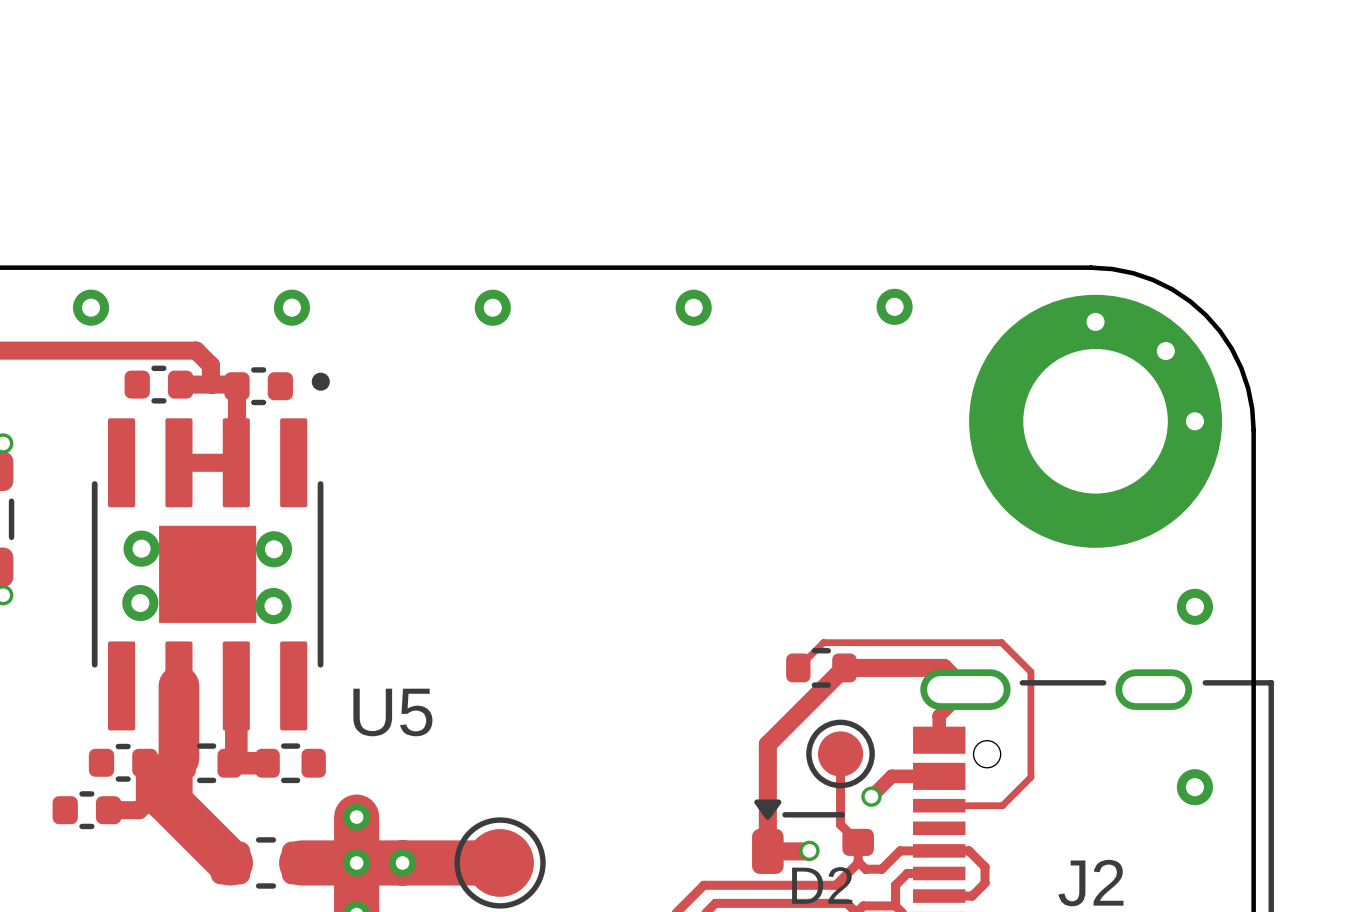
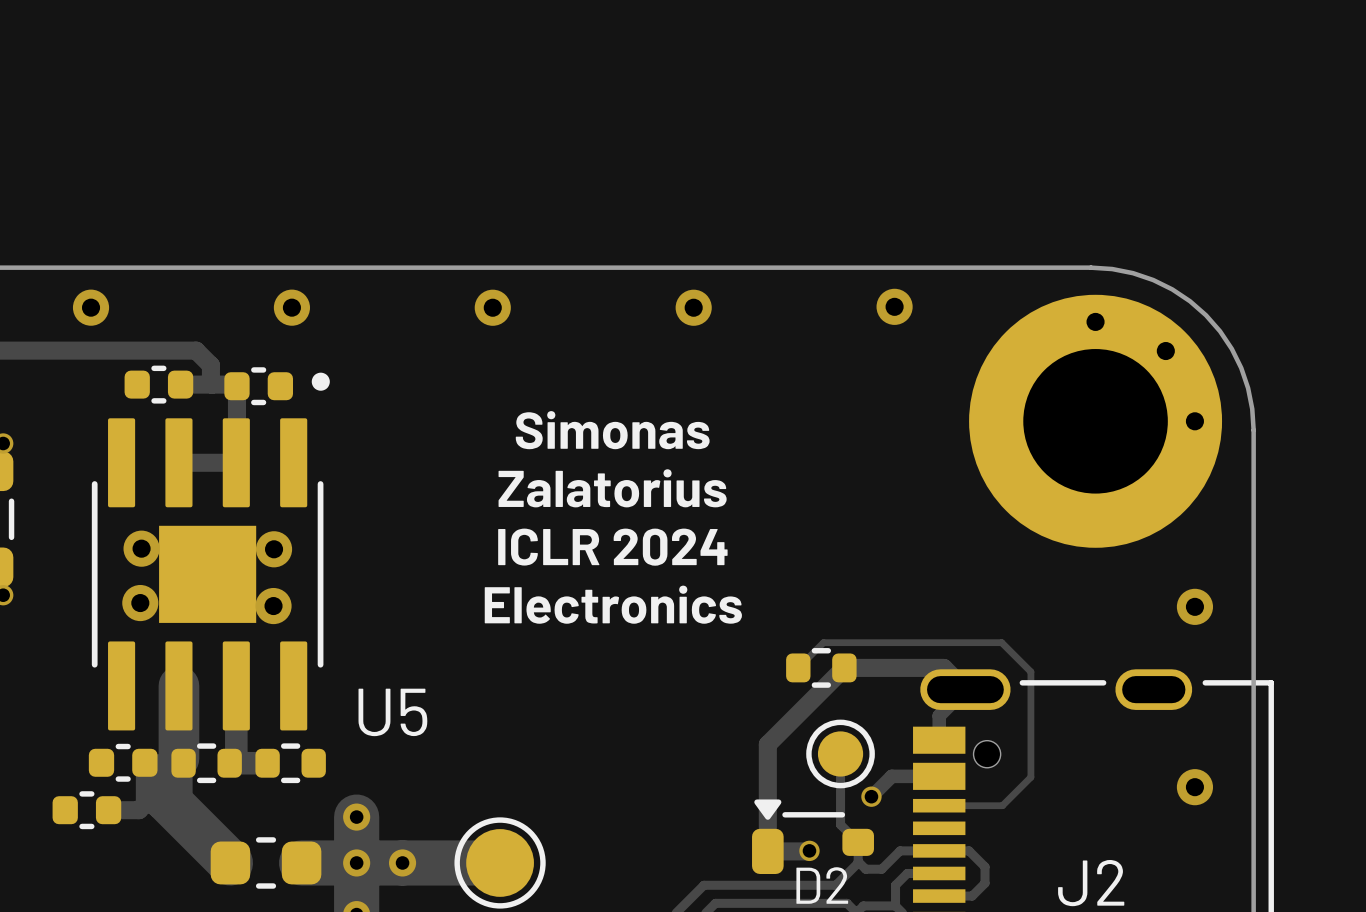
text: none -> Simonas (612, 430)
text: none -> Zalatorius (612, 488)
text: none -> ICLR 2024 (612, 547)
text: none -> Electronics (613, 604)

